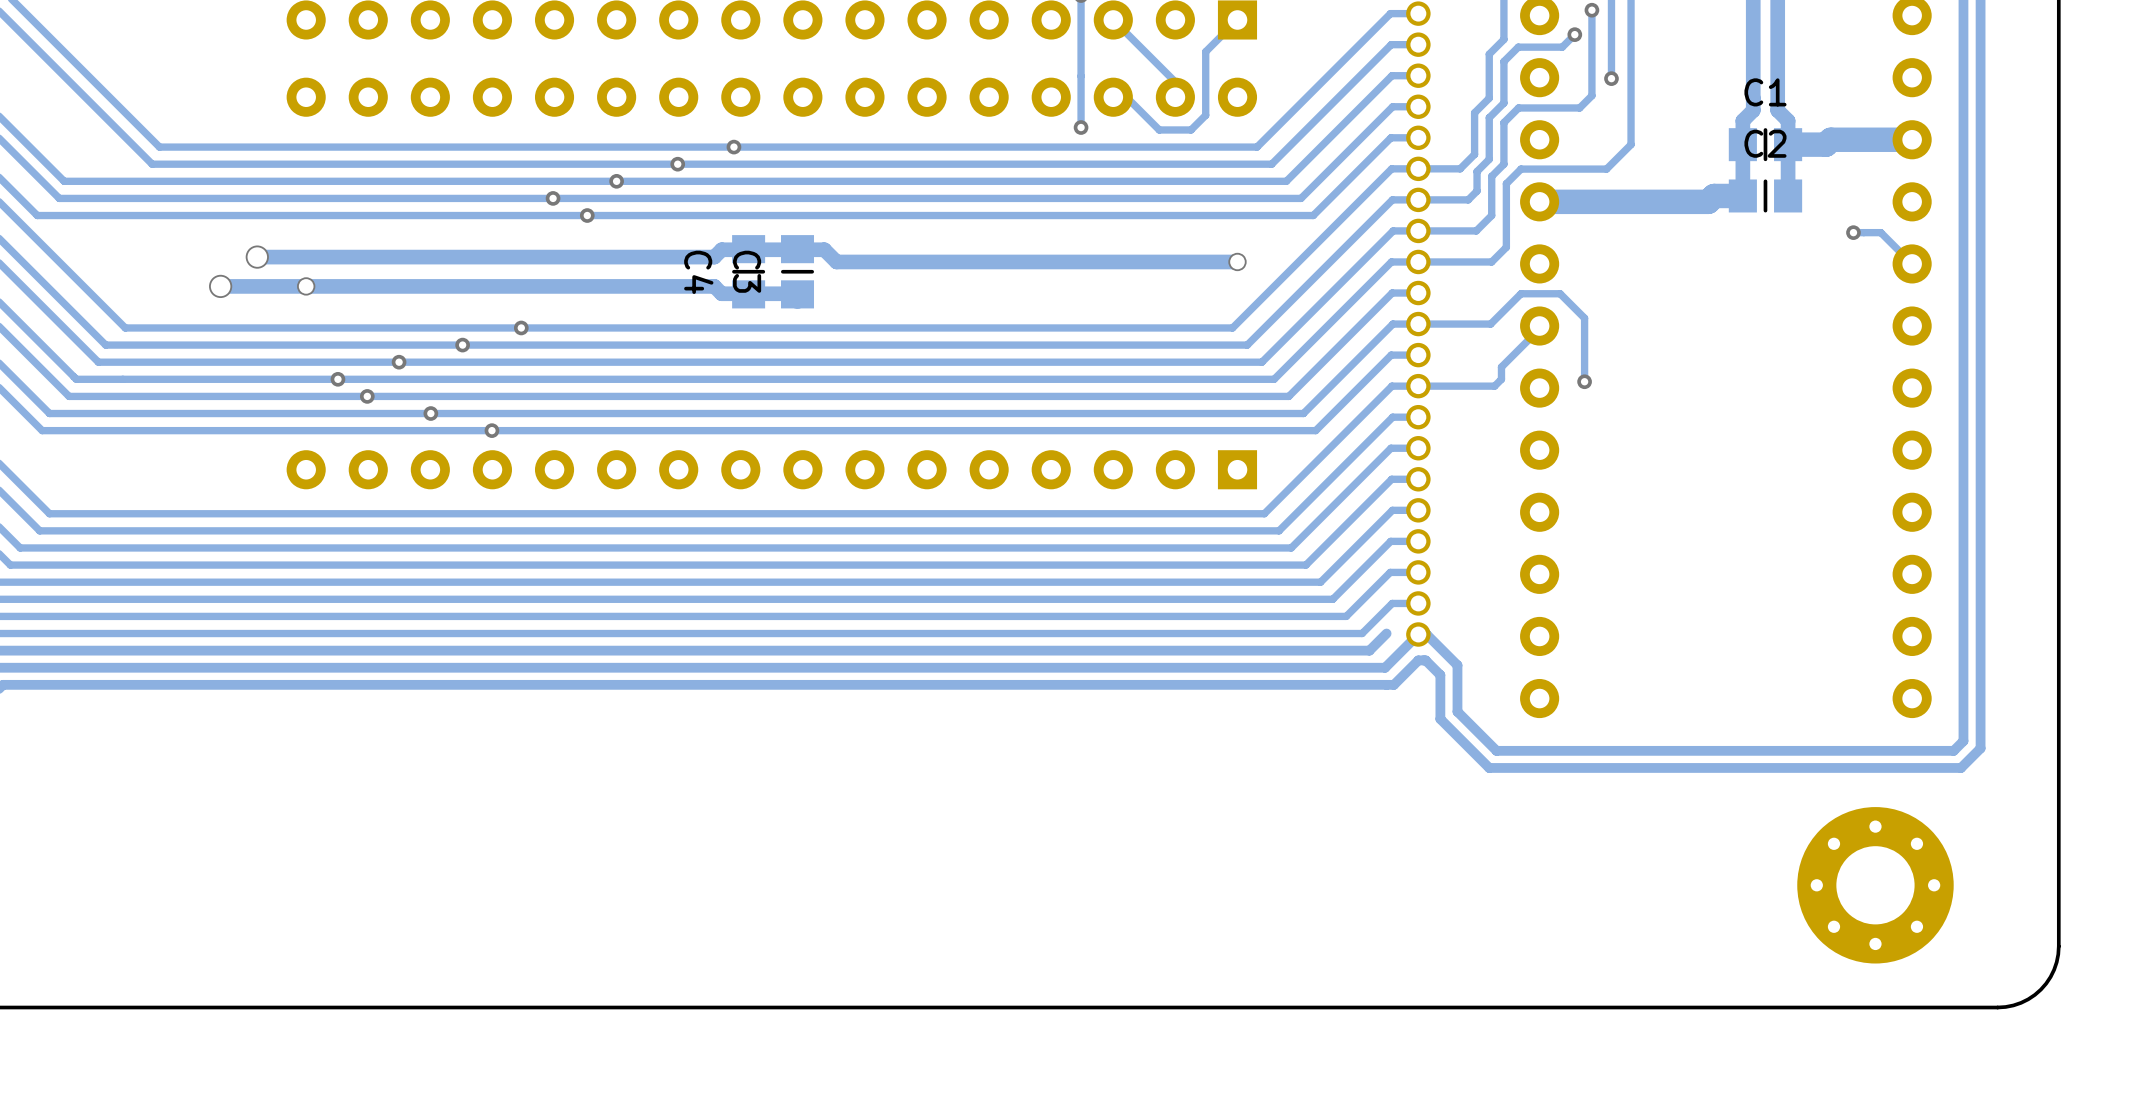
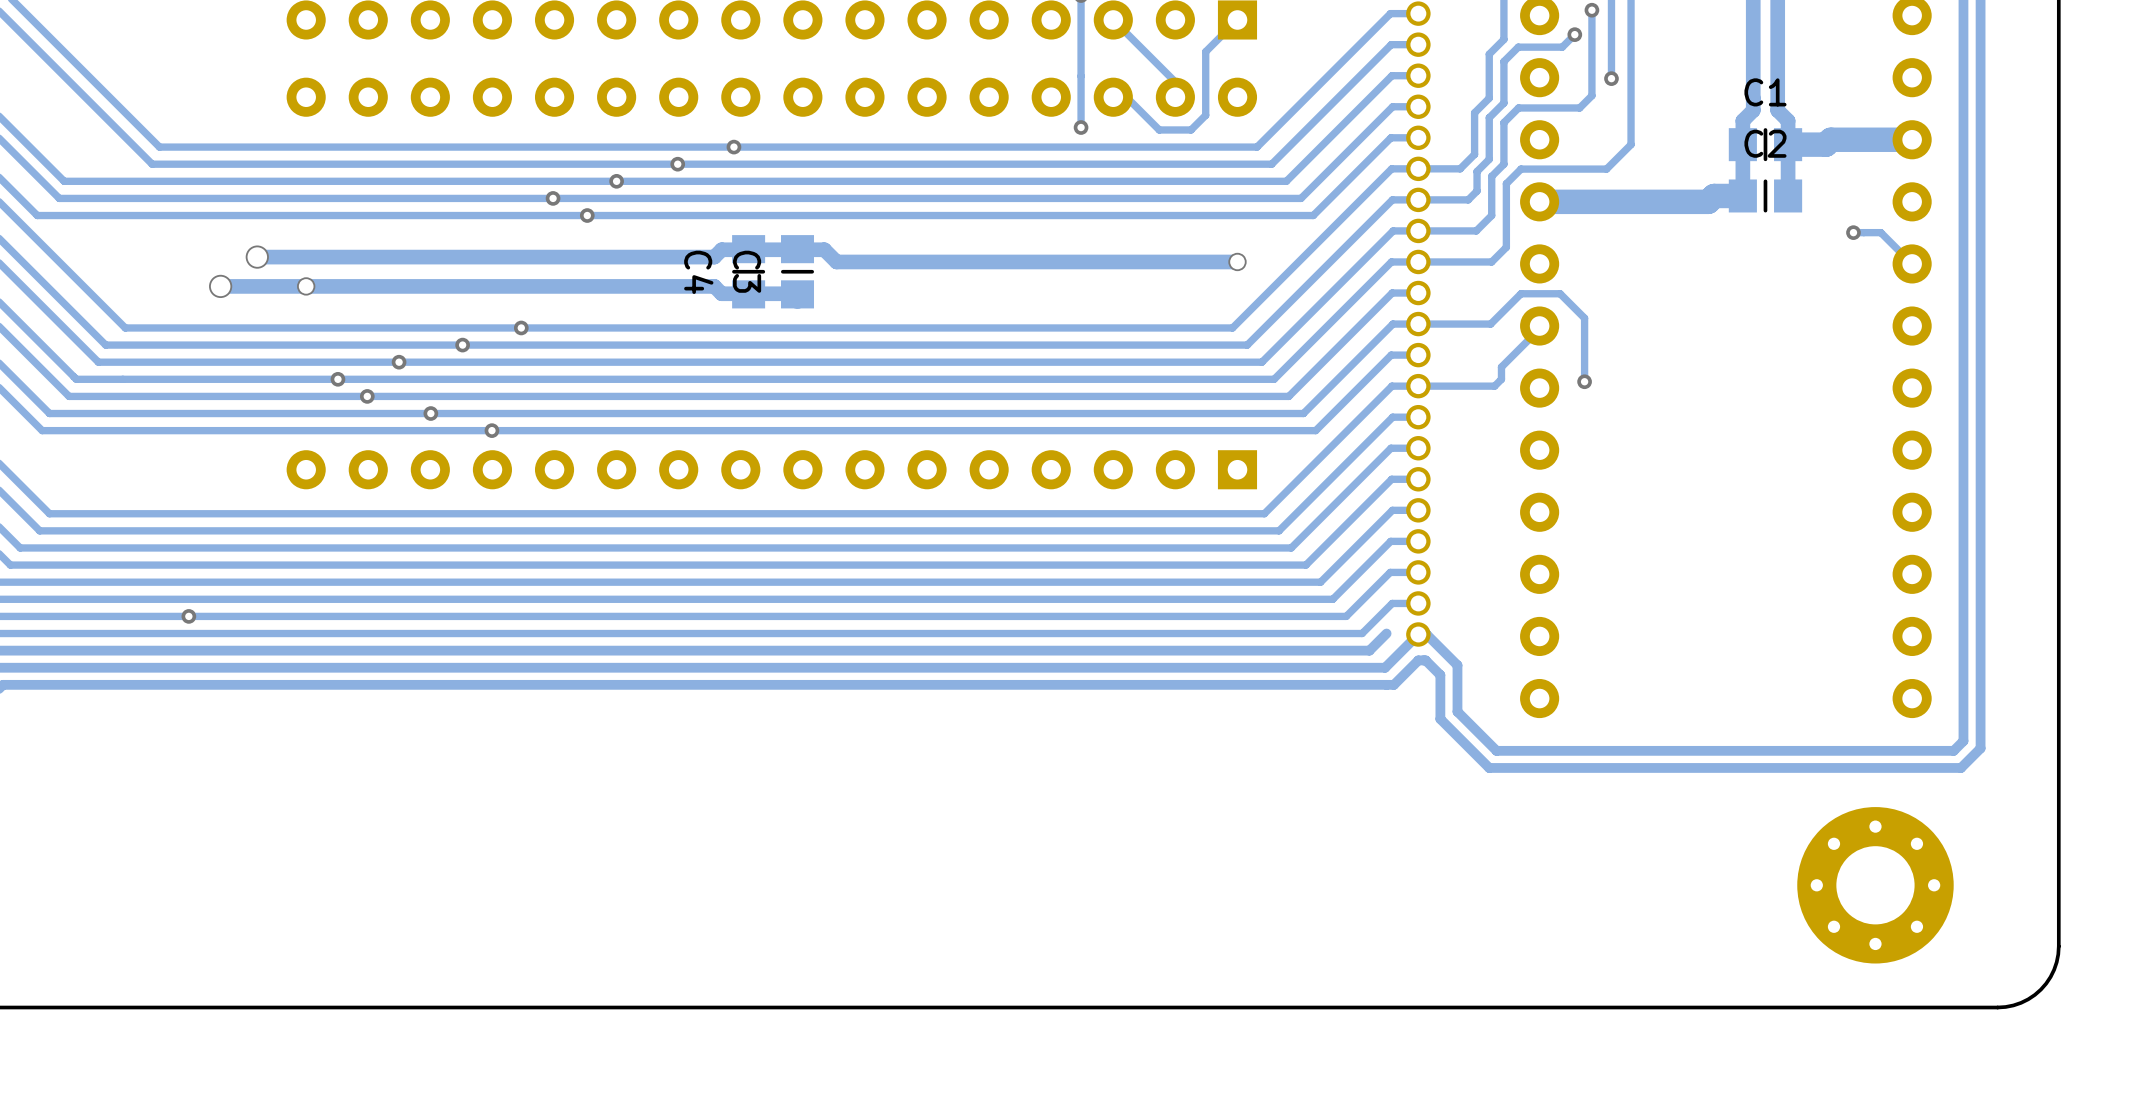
via: none -> (188, 616)

